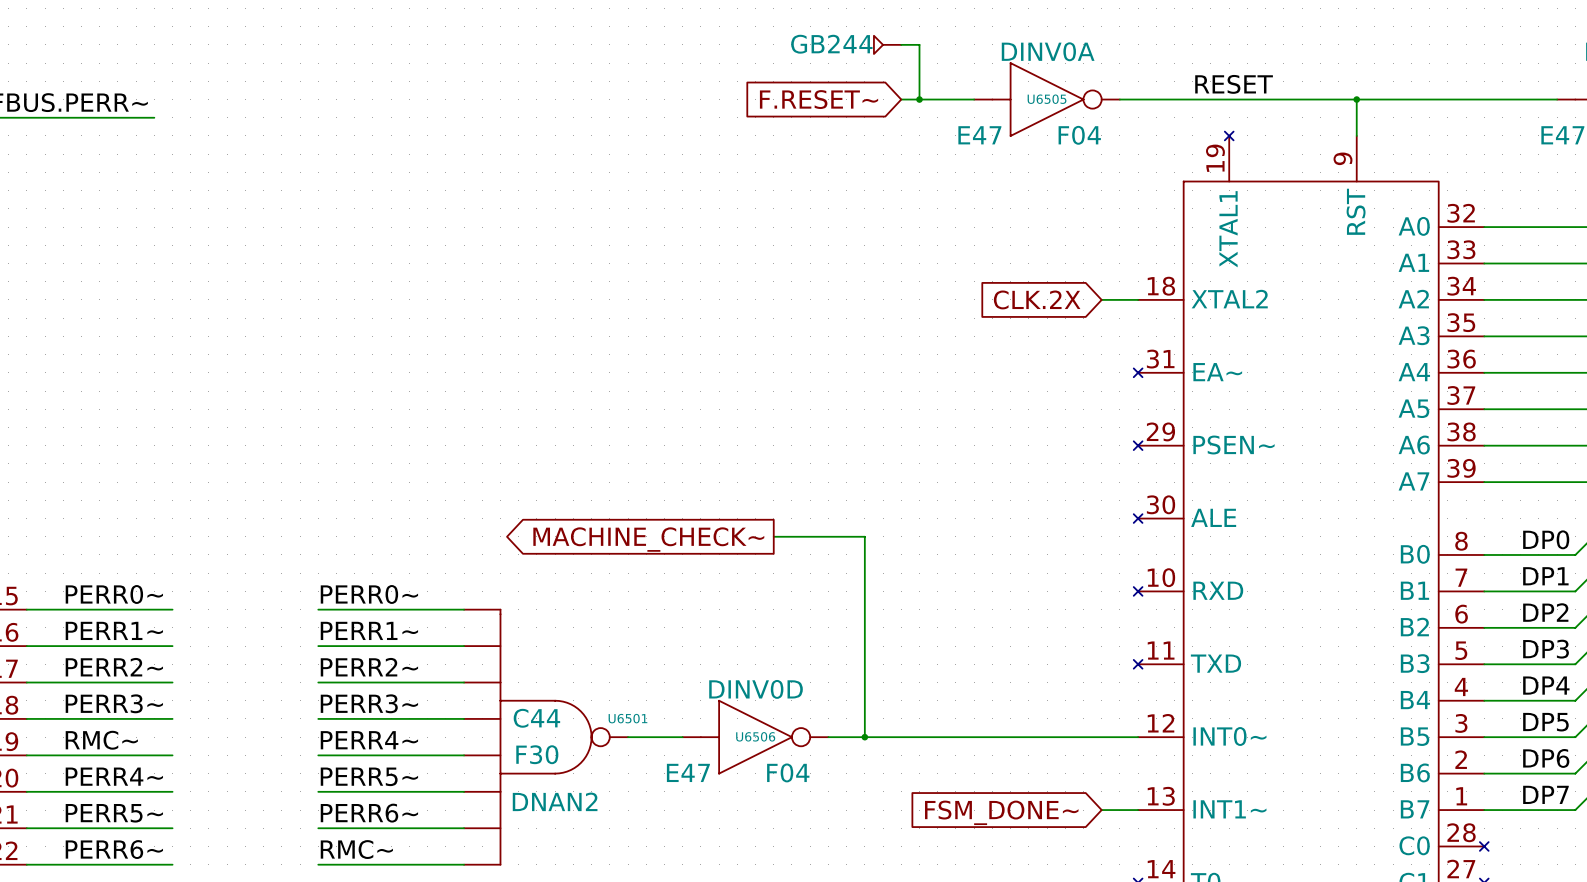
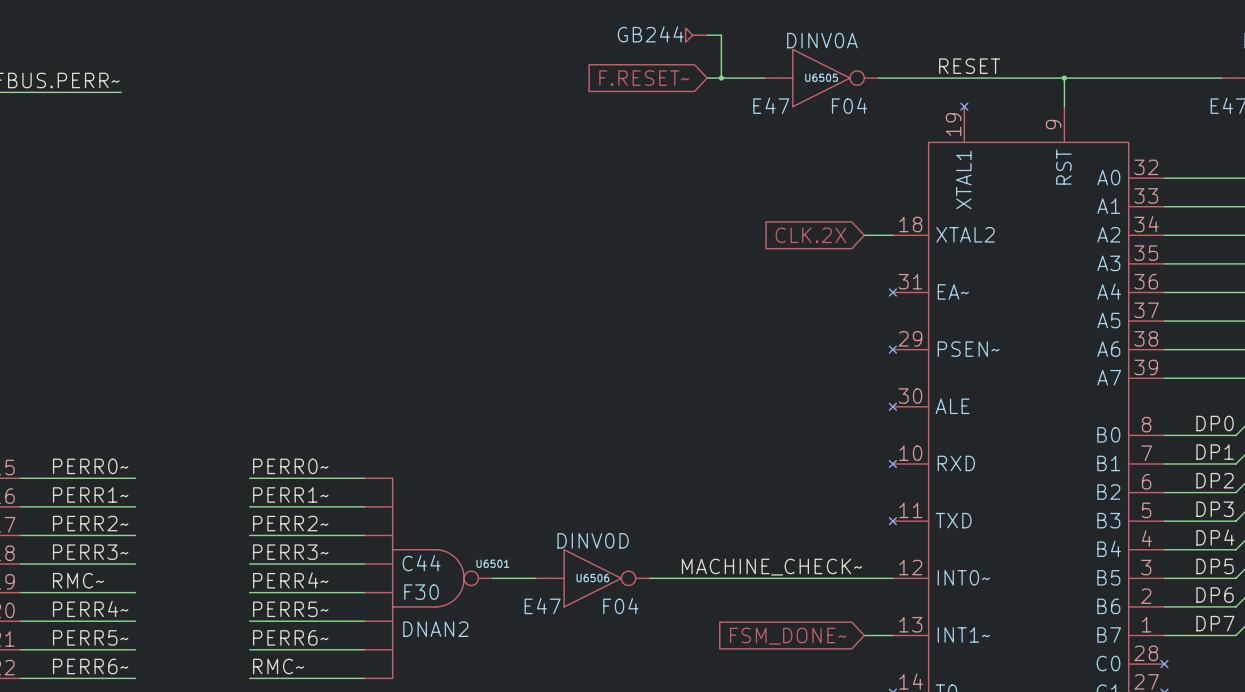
wire: (773, 536) (864, 536) (864, 737) -> none
global label: MACHINE_CHECK~ (648, 539) -> none
label: none -> MACHINE_CHECK~ (771, 567)
junction: (864, 737) -> none

